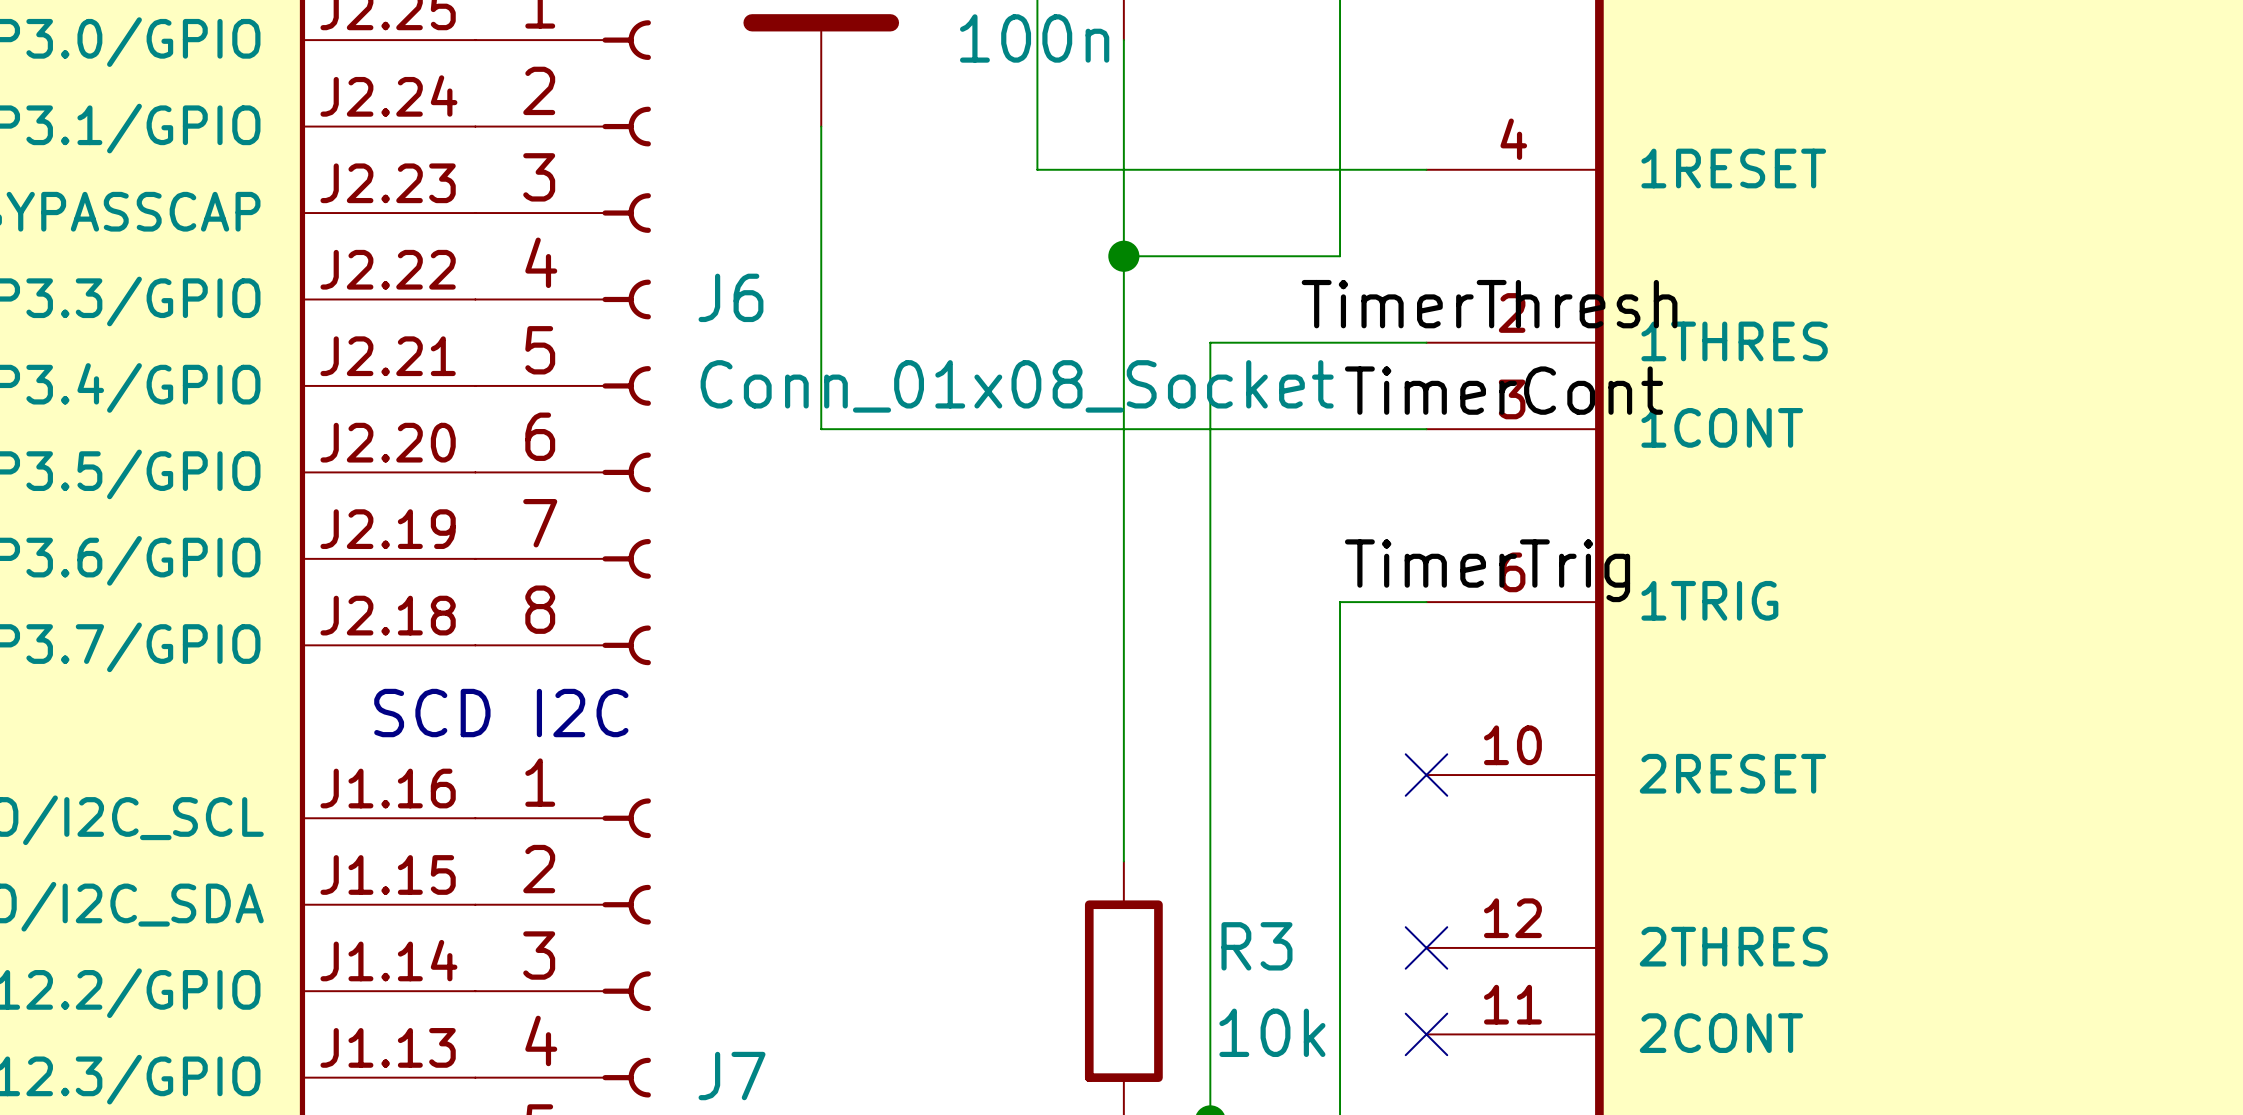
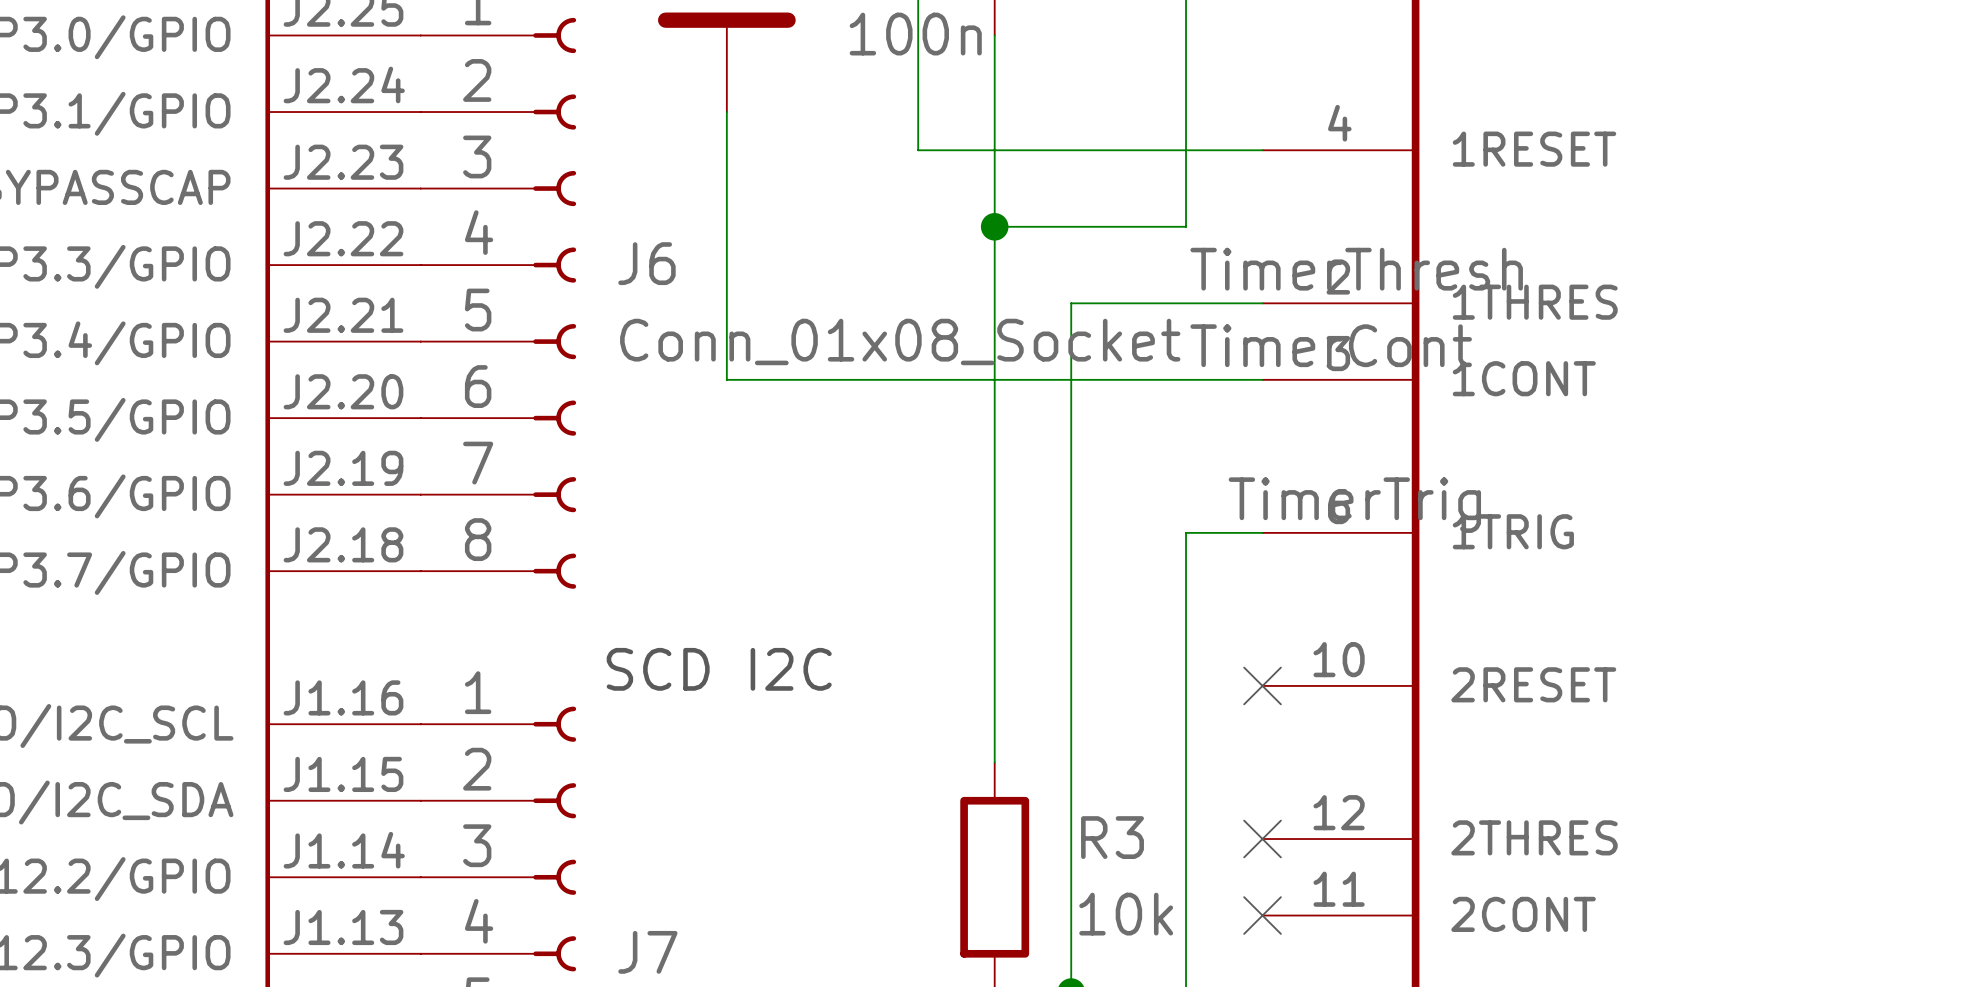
label position: TimerThresh (1489, 304) -> TimerThresh (1356, 269)
label position: TimerTrig (1487, 570) -> TimerTrig (1354, 505)
text position: SCD I2C (501, 713) -> SCD I2C (719, 669)

